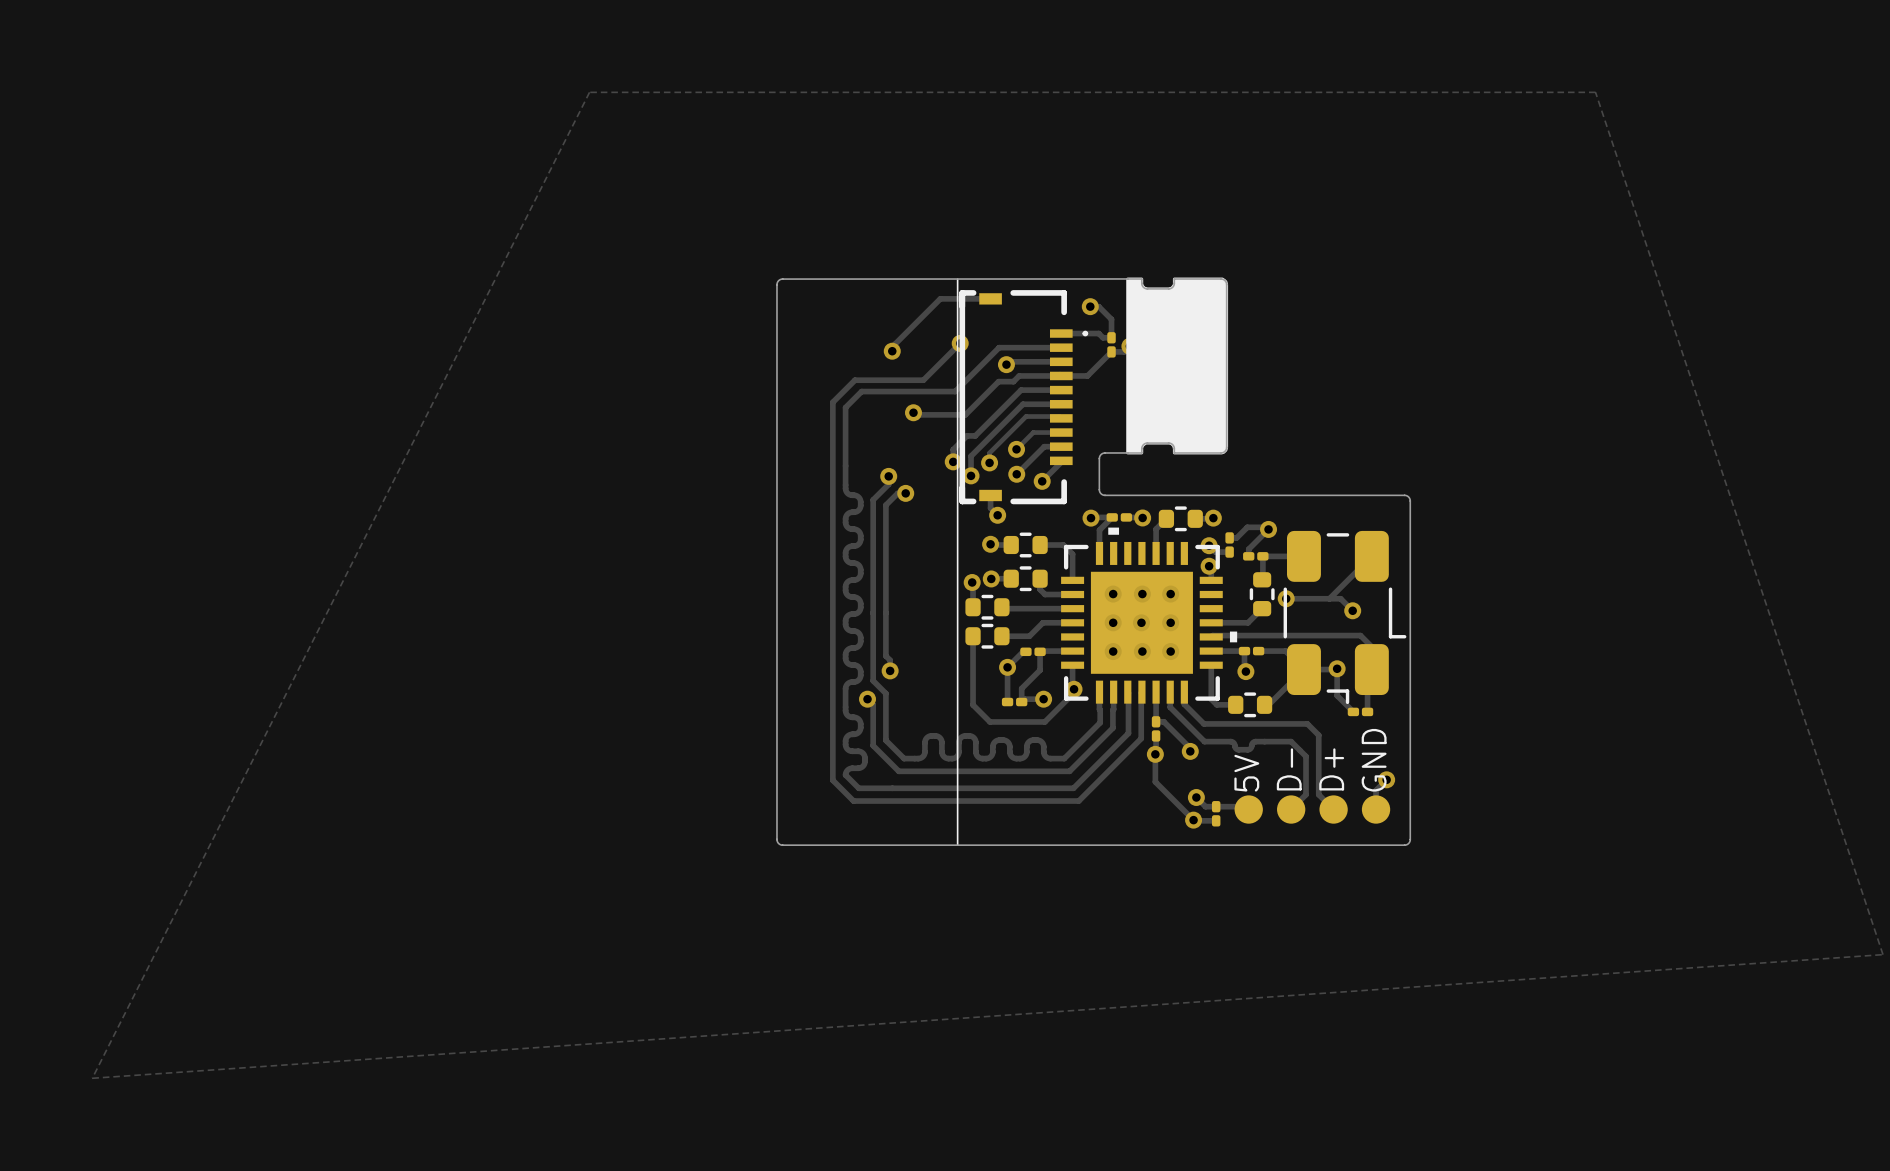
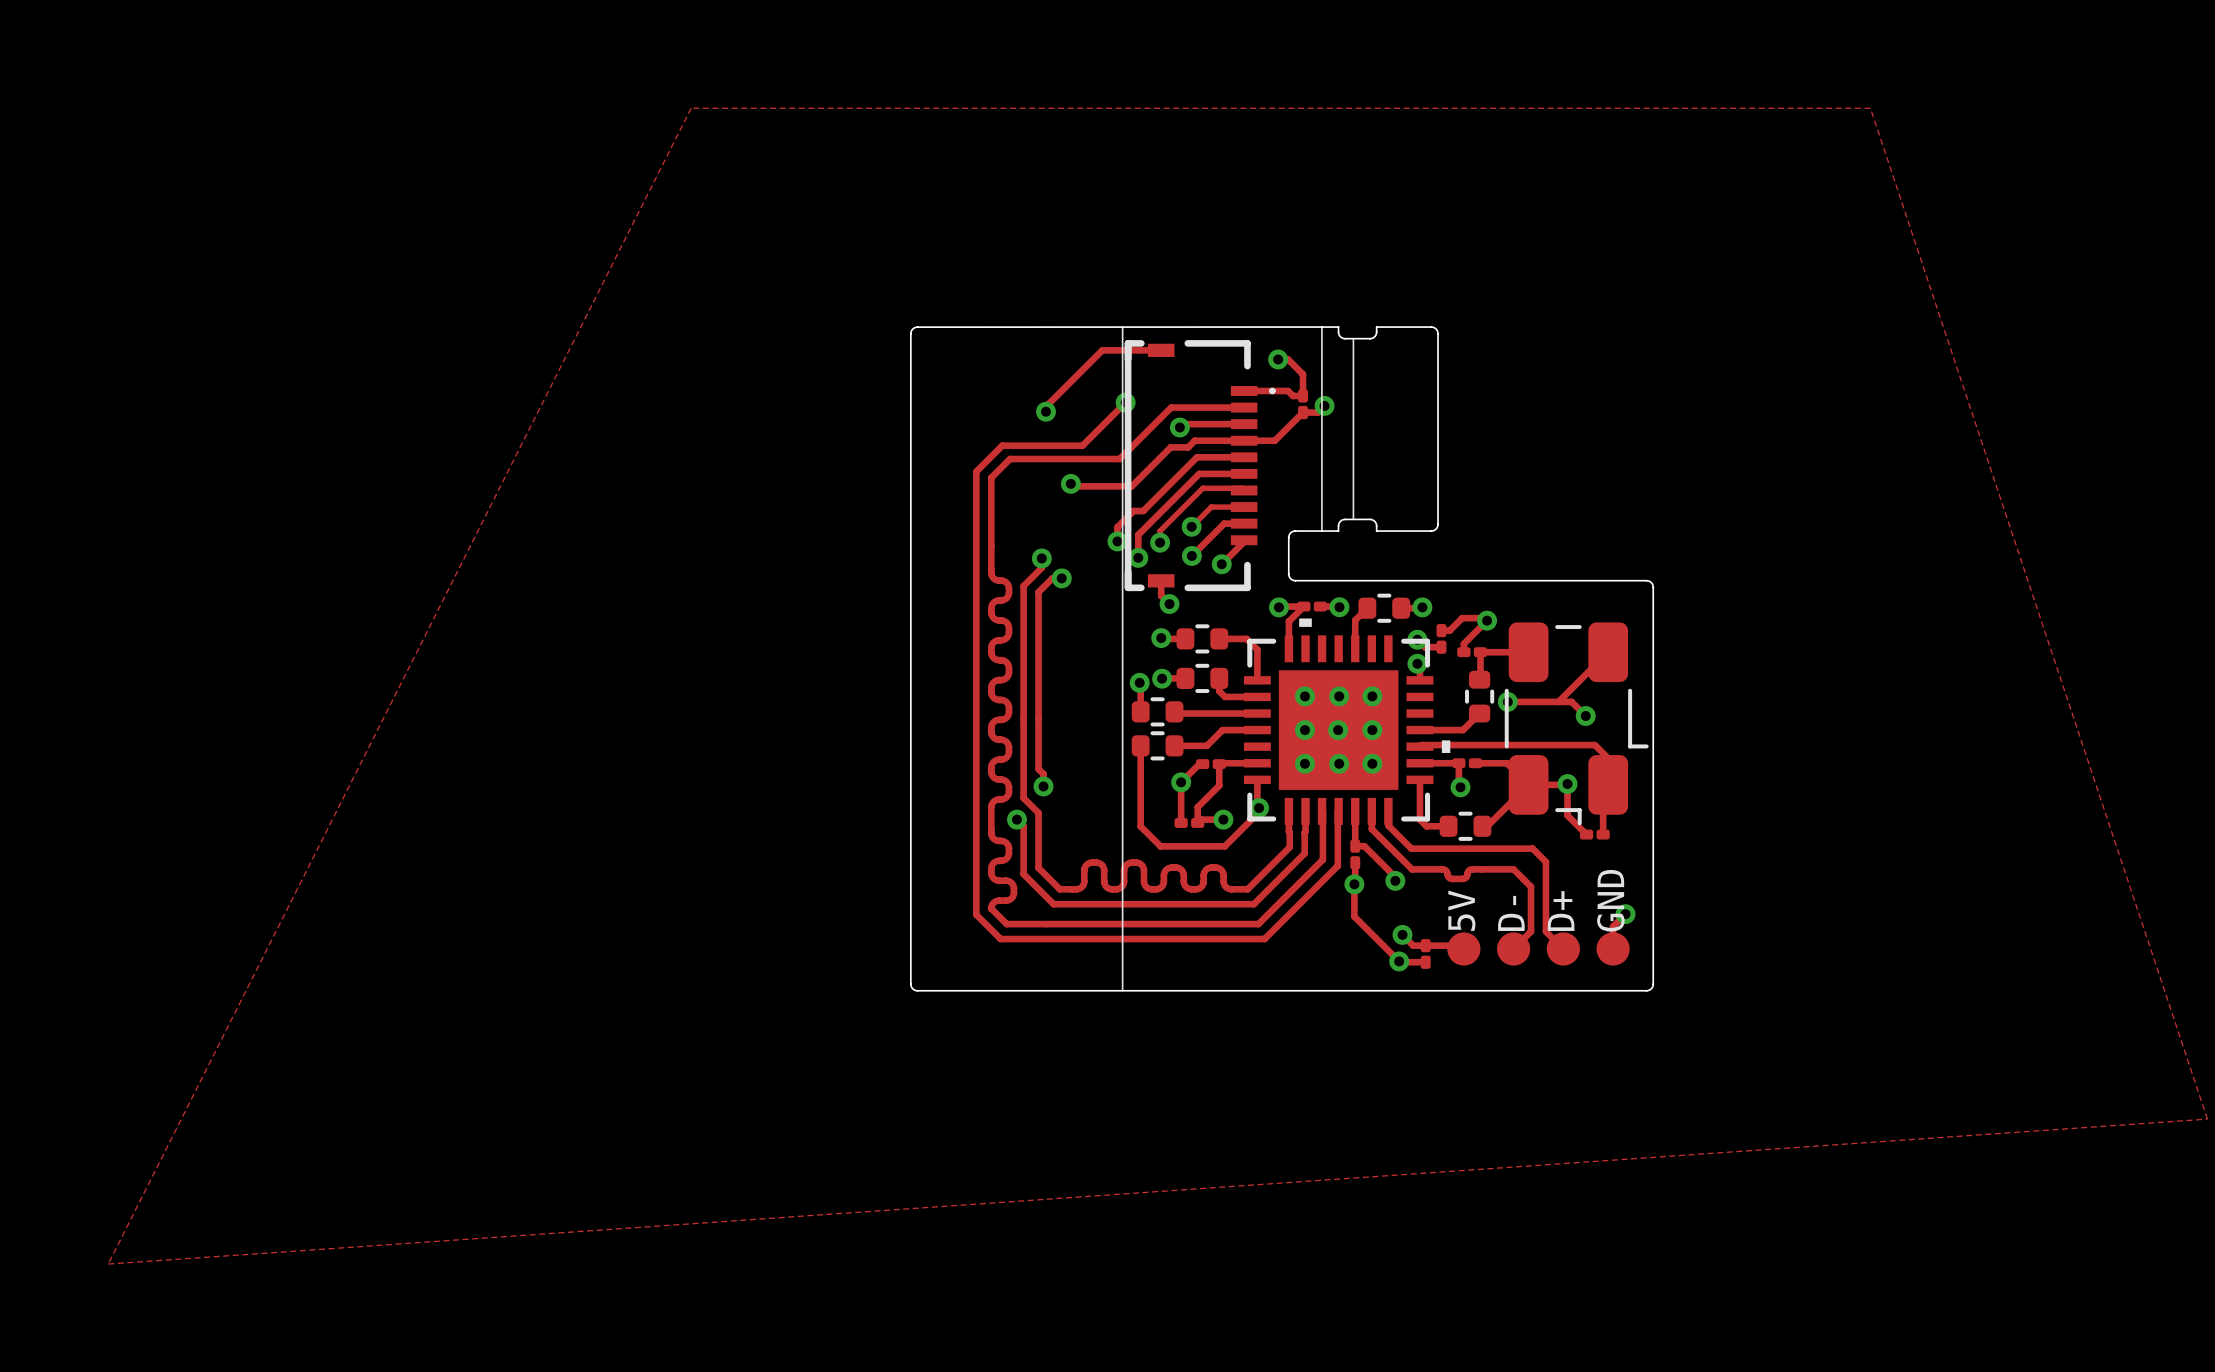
part footprint: [1126, 277, 1229, 455] -> [1321, 326, 1439, 532]

